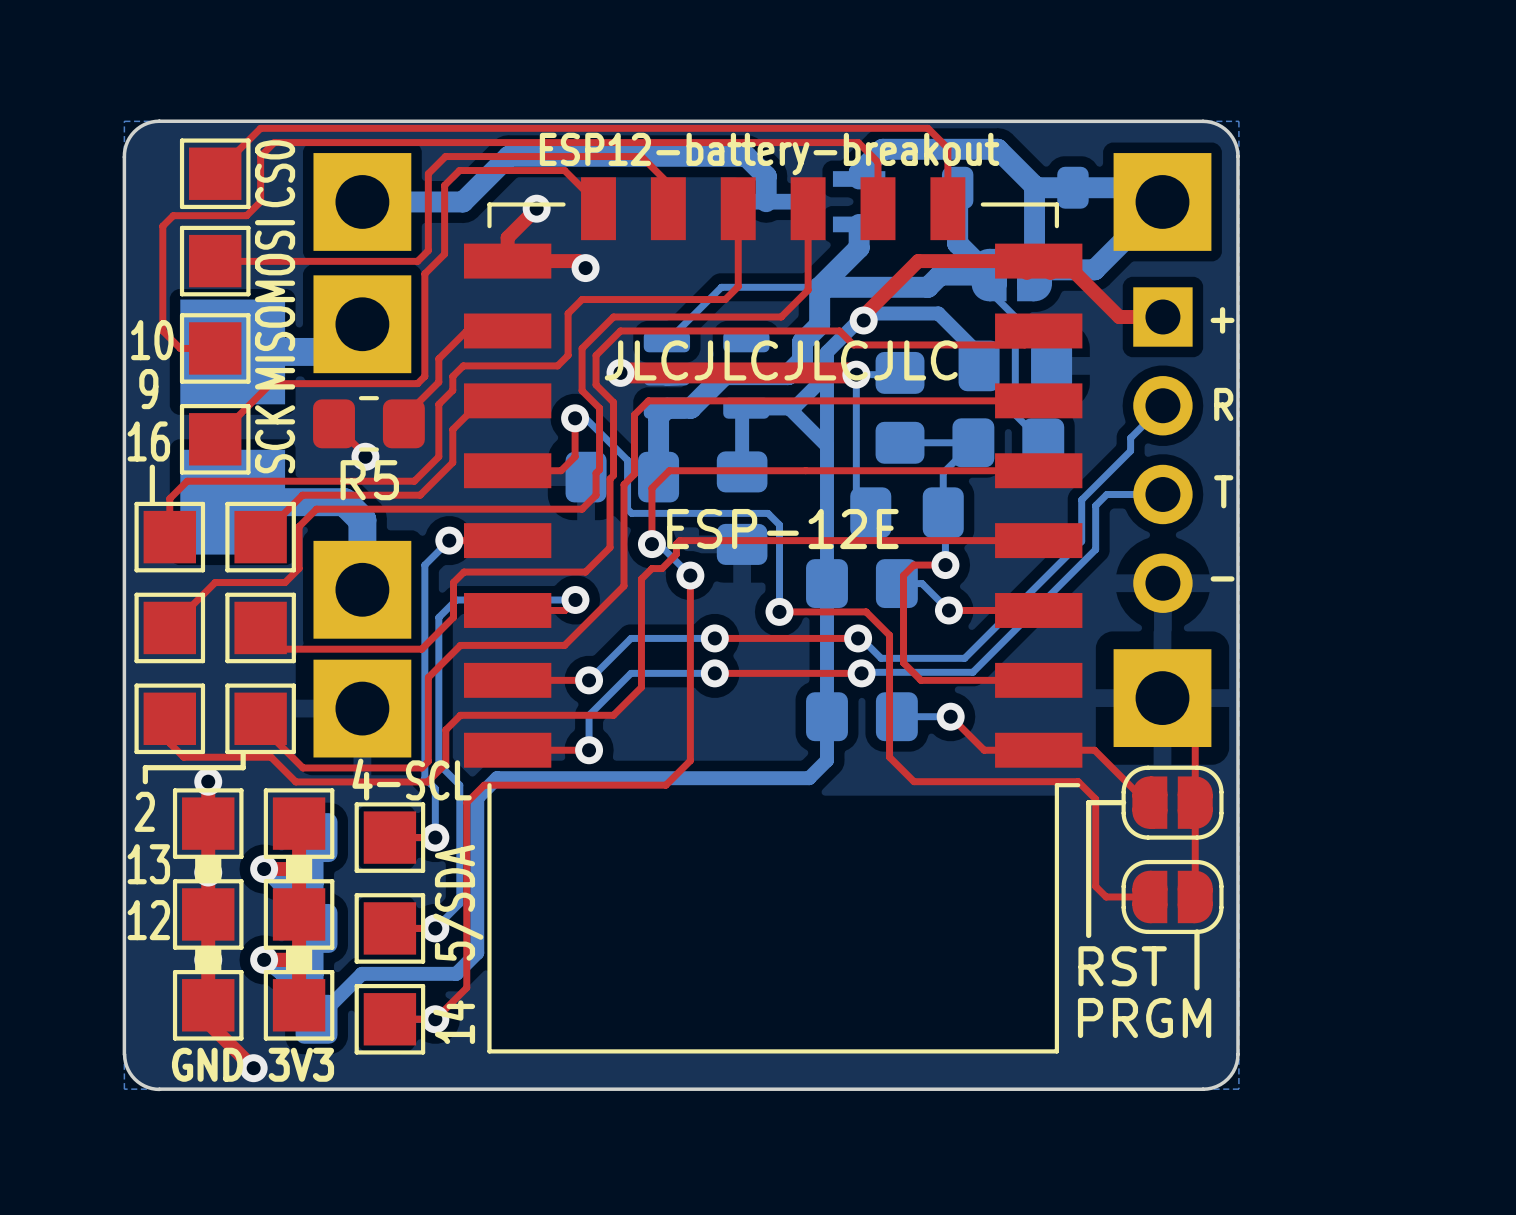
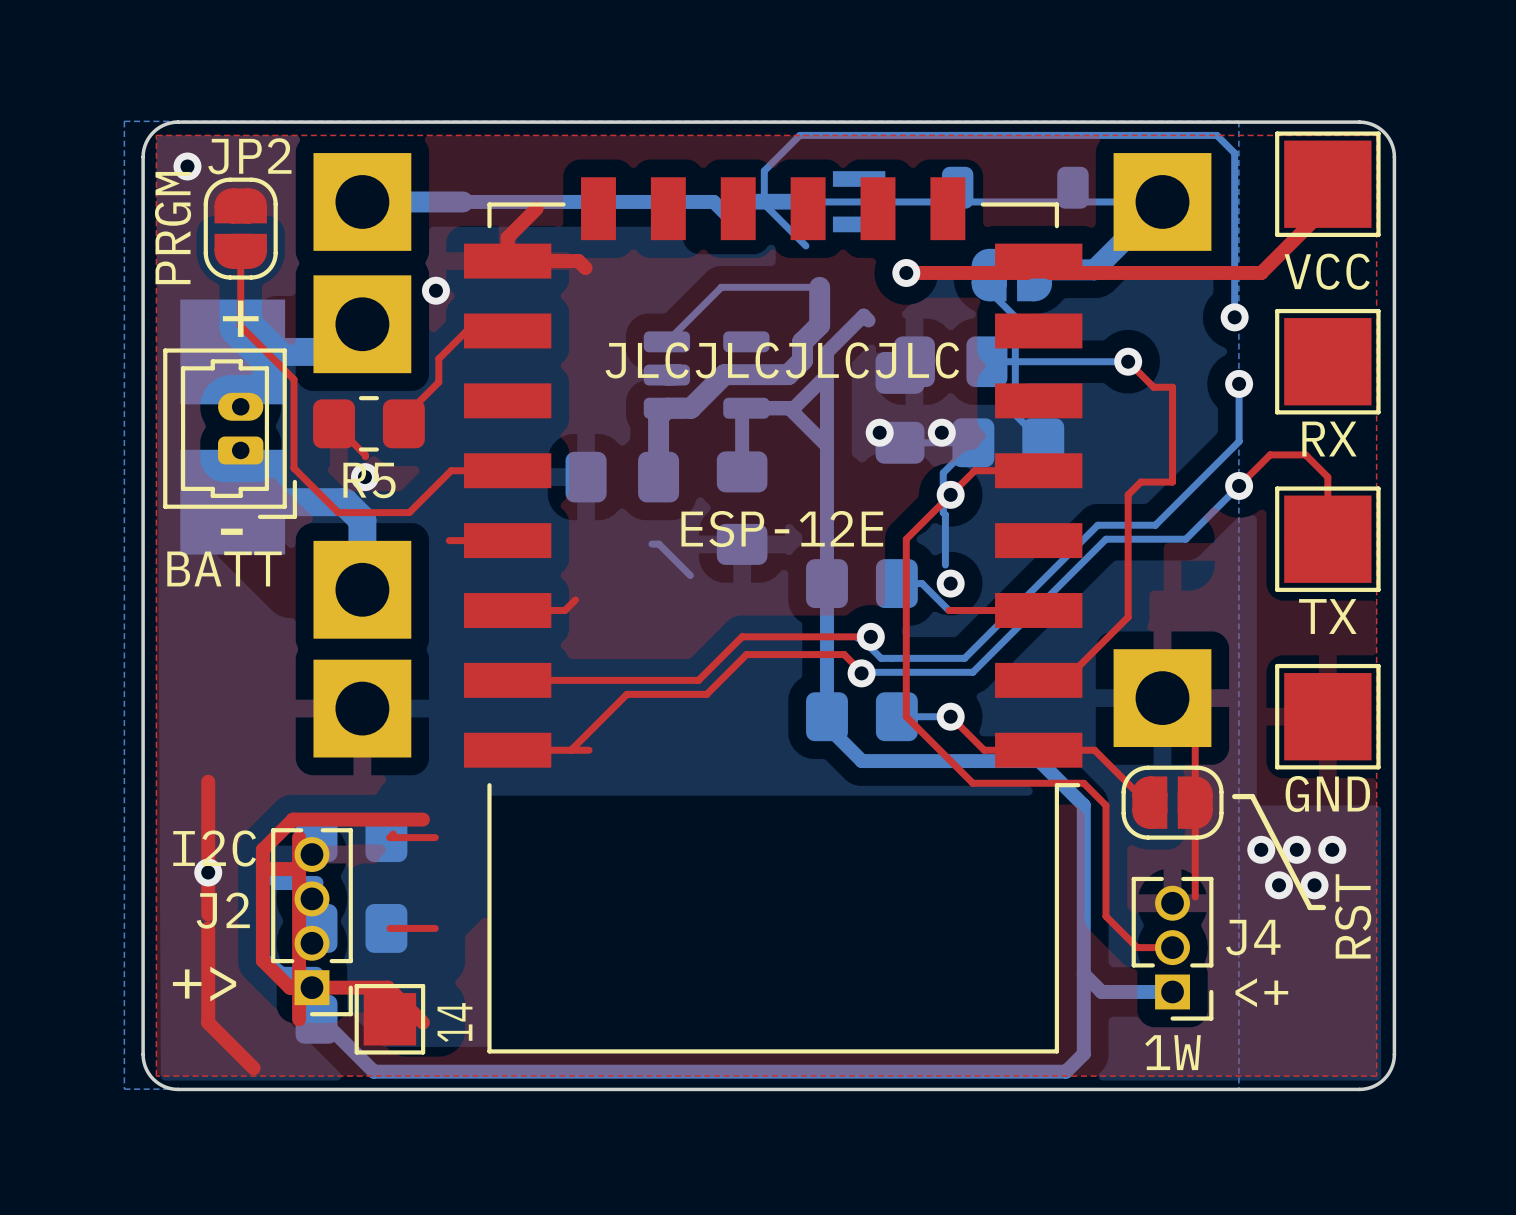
board edge: none -> (178, 122) (1359, 122) (1371, 124) (1381, 129) (1390, 141) (1394, 157) (1394, 1054) (1392, 1066) (1386, 1076) (1374, 1085) (1359, 1089) (178, 1089) (166, 1087) (156, 1081) (146, 1069) (143, 1054) (143, 157) (146, 141) (153, 132) (166, 124) (178, 122)
top zone outline: none -> (156, 135) (156, 1076) (1376, 1076) (1376, 135) (156, 135)
text: ESP12-battery-breakout (769, 154) -> none
via: none -> (187, 166)
top track: (215, 173) (260, 128) (927, 128) (947, 148) (947, 208) -> none
part: CS0 (215, 173) -> none
bottom track: (859, 178) (859, 172) (882, 149) (997, 149) (1036, 187) (1148, 187) (1162, 201) -> (812, 201) (1162, 201)
top track: none -> (1327, 184) (1327, 206) (1261, 272) (1050, 272)
part: none -> VCC (1327, 184)
bottom track: (1034, 185) (1034, 275) -> none
bottom track: (957, 187) (957, 243) (989, 275) (940, 275) (927, 287) (819, 287) (859, 247) (859, 224) -> none
bottom track: (766, 201) (766, 176) (746, 156) (508, 156) (463, 201) -> (740, 228) (713, 201) (463, 201)
via: (536, 208) -> none
top track: (598, 208) (598, 204) (564, 170) (459, 170) (444, 185) (444, 254) (424, 273) (424, 376) (417, 383) (270, 383) (215, 439) -> none
top track: (668, 208) (668, 183) (641, 156) (445, 156) (428, 173) (428, 250) (417, 261) (215, 261) -> none
top track: (738, 208) (738, 286) (725, 299) (582, 299) (568, 313) (568, 355) (557, 365) (463, 365) (452, 376) (452, 390) (438, 404) (438, 456) (414, 481) (187, 481) (169, 498) (169, 537) -> none
top track: (808, 208) (808, 290) (781, 317) (613, 317) (582, 348) (582, 390) (599, 408) (599, 469) (596, 473) (596, 495) (582, 509) (316, 509) (299, 526) (299, 568) (285, 582) (215, 582) (169, 627) -> none
top track: (878, 208) (878, 162) (858, 142) (274, 142) (260, 156) (260, 201) (246, 215) (173, 215) (162, 226) (162, 330) (180, 348) (215, 348) -> none
JP2: none -> PRGM (240, 228)
bottom track: none -> (805, 245) (764, 204) (764, 170) (799, 135) (1216, 135) (1234, 153) (1234, 317)
part: MOSI (215, 261) -> none
via: (585, 268) -> none
top track: none -> (906, 272) (1026, 272)
via: none -> (906, 272)
via: none -> (435, 290)
top track: (863, 315) (918, 261) (1063, 261) (1119, 317) (1162, 317) -> none
via: none -> (1234, 317)
bottom track: (863, 320) (870, 313) (938, 313) (979, 354) (979, 365) -> none
via: (863, 320) -> none
text: + (1222, 320) -> none
text: none -> + (240, 318)
top track: (1038, 330) (1024, 344) (853, 344) (839, 330) (620, 330) (596, 355) (596, 384) (613, 402) (613, 475) (610, 478) (610, 547) (585, 572) (463, 572) (453, 582) (453, 617) (421, 649) (281, 649) (260, 627) -> none
part: MISO (215, 348) -> none
bottom track: none -> (986, 361) (1128, 361)
via: none -> (1128, 361)
part: none -> RX (1327, 361)
part position: (1015, 365) -> (950, 361)
top track: (620, 372) (854, 372) (856, 374) -> none
via: (620, 372) -> none
bottom track: (900, 372) (898, 374) (856, 374) (856, 498) (870, 512) -> none
via: (856, 374) -> none
via: none -> (1239, 383)
top track: (507, 400) (481, 400) (452, 429) (452, 462) (420, 495) (302, 495) (260, 537) -> none
top track: (1038, 400) (648, 400) (634, 414) (634, 474) (624, 484) (624, 586) (564, 645) (460, 645) (428, 677) (428, 761) (421, 767) (303, 767) (260, 725) (260, 718) -> none
part footprint: [179, 404, 251, 475] -> [163, 348, 297, 519]
text: R (1223, 404) -> none
bottom track: (1162, 405) (1130, 438) (1130, 450) (1081, 499) (1081, 541) -> (1239, 383) (1239, 441) (1155, 525) (1097, 525) (1081, 541)
top track: (575, 418) (575, 456) (561, 470) (507, 470) -> (240, 251) (240, 326) (293, 379) (293, 468) (338, 512) (409, 512) (451, 470) (507, 470)
bottom track: (575, 418) (585, 418) (627, 460) (627, 509) (631, 513) (767, 513) (779, 524) (779, 611) -> none
via: (575, 418) -> none
via: none -> (879, 432)
via: none -> (941, 432)
part value: SCK (275, 439) -> BATT (224, 568)
part: (1162, 450) -> none
via position: (365, 456) -> (364, 477)
line: (152, 467) (152, 502) -> none
top track: (974, 470) (669, 470) (651, 488) (651, 544) -> (974, 470) (906, 539) (906, 716) (972, 783) (1083, 783) (1105, 805) (1105, 916) (1137, 947) (1172, 947)
top track: none -> (1239, 485) (1270, 454) (1305, 454) (1327, 477) (1327, 539) (1287, 539)
via: none -> (1239, 485)
text: T (1223, 491) -> none
via: none -> (950, 494)
bottom track: (1162, 494) (1106, 494) (1095, 505) (1095, 549) -> (1239, 485) (1185, 539) (1105, 539) (1095, 549)
part: (907, 512) -> none
text: none -> - (231, 531)
part: 10 (169, 537) -> none
part: 2 (260, 537) -> none
part: none -> TX (1327, 539)
bottom track: (449, 540) (424, 565) (424, 778) (435, 788) (435, 837) (386, 837) -> none
via: (449, 540) -> none
top track: (1038, 540) (679, 540) (676, 544) (676, 554) (662, 568) (651, 568) (641, 579) (641, 687) (613, 715) (460, 715) (445, 729) (445, 763) (427, 781) (295, 781) (271, 757) (183, 757) (169, 743) (169, 718) -> none
via: (651, 544) -> none
top track: (945, 558) (945, 565) (913, 565) (903, 575) (903, 662) (920, 680) (1038, 680) -> (1128, 361) (1153, 387) (1172, 387) (1172, 482) (1140, 482) (1128, 494) (1128, 617) (1064, 680) (1038, 680)
via: (945, 565) -> none
top track: (690, 575) (690, 760) (665, 785) (484, 785) (466, 802) (466, 987) (435, 1019) (389, 1019) -> none
via: (690, 575) -> none
text: - (1222, 578) -> none
via: none -> (950, 583)
via: (575, 599) -> none
bottom track: (575, 600) (456, 600) (438, 617) (438, 764) (459, 785) (459, 903) (435, 928) (386, 928) -> none
via: (948, 610) -> none
top track: (779, 611) (866, 611) (889, 635) (889, 757) (913, 781) (1078, 781) (1095, 799) (1095, 886) (1106, 896) (1149, 896) -> none
via: (779, 611) -> none
part: 9 (169, 627) -> none
part: 13 (260, 627) -> none
top track: none -> (870, 636) (742, 636) (698, 680) (589, 680)
top track: (714, 638) (858, 638) -> none
bottom track: (714, 638) (630, 638) (589, 680) -> none
via: (714, 638) -> none
via position: (858, 638) -> (870, 636)
top track: (714, 673) (861, 673) -> (571, 750) (626, 694) (706, 694) (746, 654) (844, 654) (861, 672)
bottom track: (714, 673) (630, 673) (589, 715) (589, 750) -> none
via: (714, 673) -> none
via: (589, 680) -> none
part: none -> GND (1327, 716)
part: 16 (169, 718) -> none
part: 12 (260, 718) -> none
bottom track: (826, 726) (826, 760) (809, 778) (497, 778) (477, 798) (477, 952) (456, 973) (361, 973) (316, 1019) (316, 837) (306, 827) -> (826, 726) (861, 761) (1039, 761) (1083, 805) (1083, 1053) (1066, 1071) (373, 1071) (312, 1009) (312, 987)
via: (589, 750) -> none
line: (243, 753) (243, 767) (145, 767) (145, 781) -> none
via: (208, 781) -> none
line: none -> (1234, 796) (1252, 796) (1310, 907) (1323, 907)
line: (1123, 802) (1088, 802) (1088, 935) -> none
top track: none -> (422, 819) (293, 819) (262, 849) (262, 960) (289, 987) (387, 987) (422, 1022)
part: (208, 823) -> none
part: (299, 823) -> none
part: 4-SCL (389, 837) -> none
via: (435, 837) -> none
via: none -> (1261, 849)
via: none -> (1296, 849)
via: none -> (1332, 849)
drawing: [195, 855, 222, 883] -> none
drawing: [285, 855, 313, 883] -> none
via: (264, 869) -> none
via: none -> (1279, 885)
via: none -> (1314, 885)
part: PRGM (1172, 896) -> none
part: (208, 914) -> none
part: (299, 914) -> none
J2: none -> I2C (312, 922)
part: 5/SDA (389, 928) -> none
via: (435, 928) -> none
line: (1196, 931) (1196, 987) -> none
drawing: [195, 946, 222, 973] -> none
drawing: [285, 946, 313, 973] -> none
J4: none -> 1W (1172, 948)
via: (264, 959) -> none
part value rotation: 0° (1122, 966) -> 90° counterclockwise (1353, 916)
part value position: RST (1122, 966) -> RST (1353, 916)
bottom track: none -> (1083, 974) (1101, 991) (1172, 991)
text: none -> +> (204, 984)
text: none -> <+ (1261, 992)
part: (208, 1005) -> none
part: (299, 1005) -> none
via: (435, 1019) -> none
board edge: (124, 1054) (124, 157) (127, 141) (137, 129) (147, 123) (159, 121) (1203, 121) (1214, 123) (1227, 131) (1236, 144) (1237, 156) (1237, 1054) (1235, 1067) (1227, 1079) (1216, 1086) (1203, 1089) (159, 1089) -> none
board edge: (124, 1054) (128, 1069) (134, 1079) (148, 1087) (159, 1089) -> none
text: GND (207, 1064) -> none
text: 3V3 (301, 1064) -> none
via: (253, 1068) -> none

